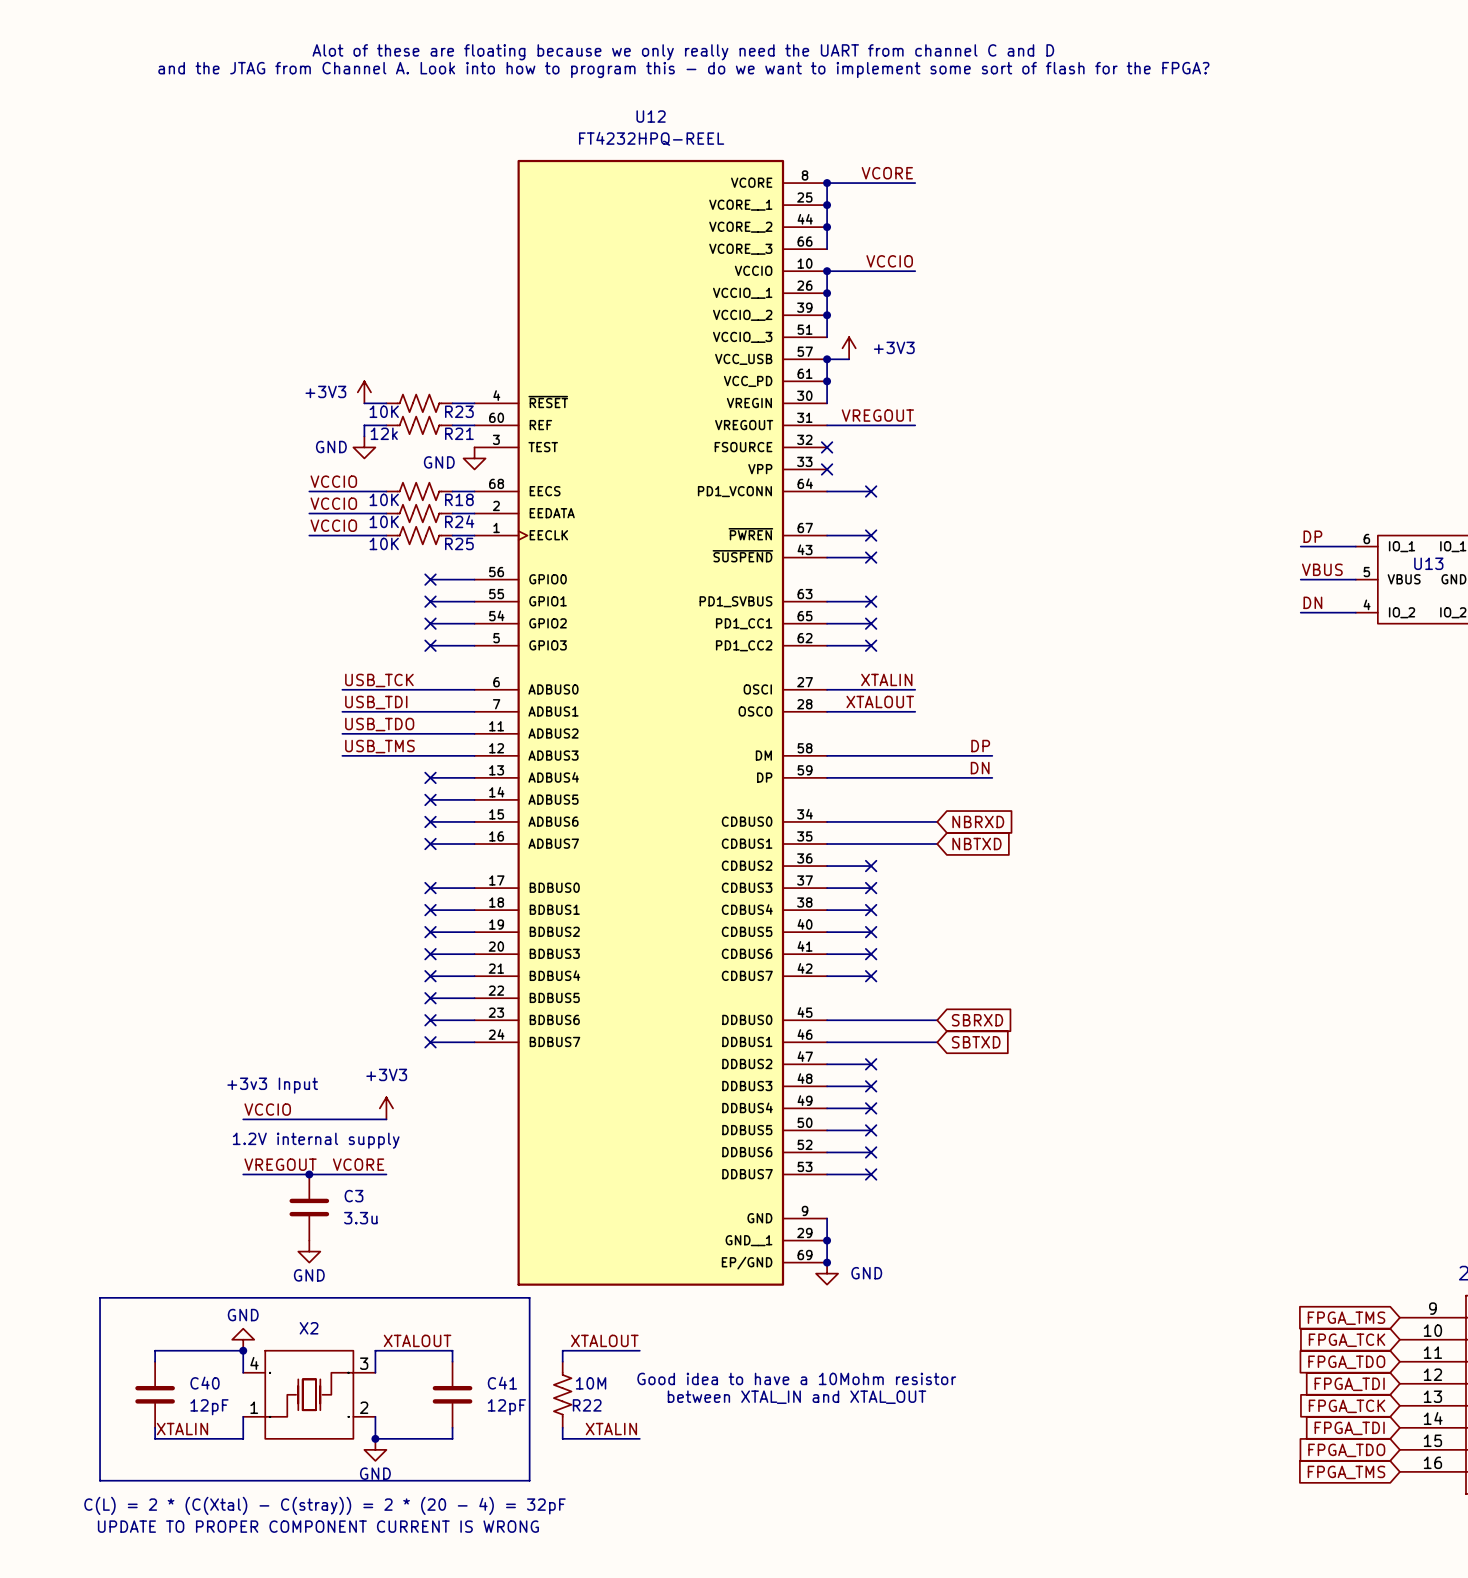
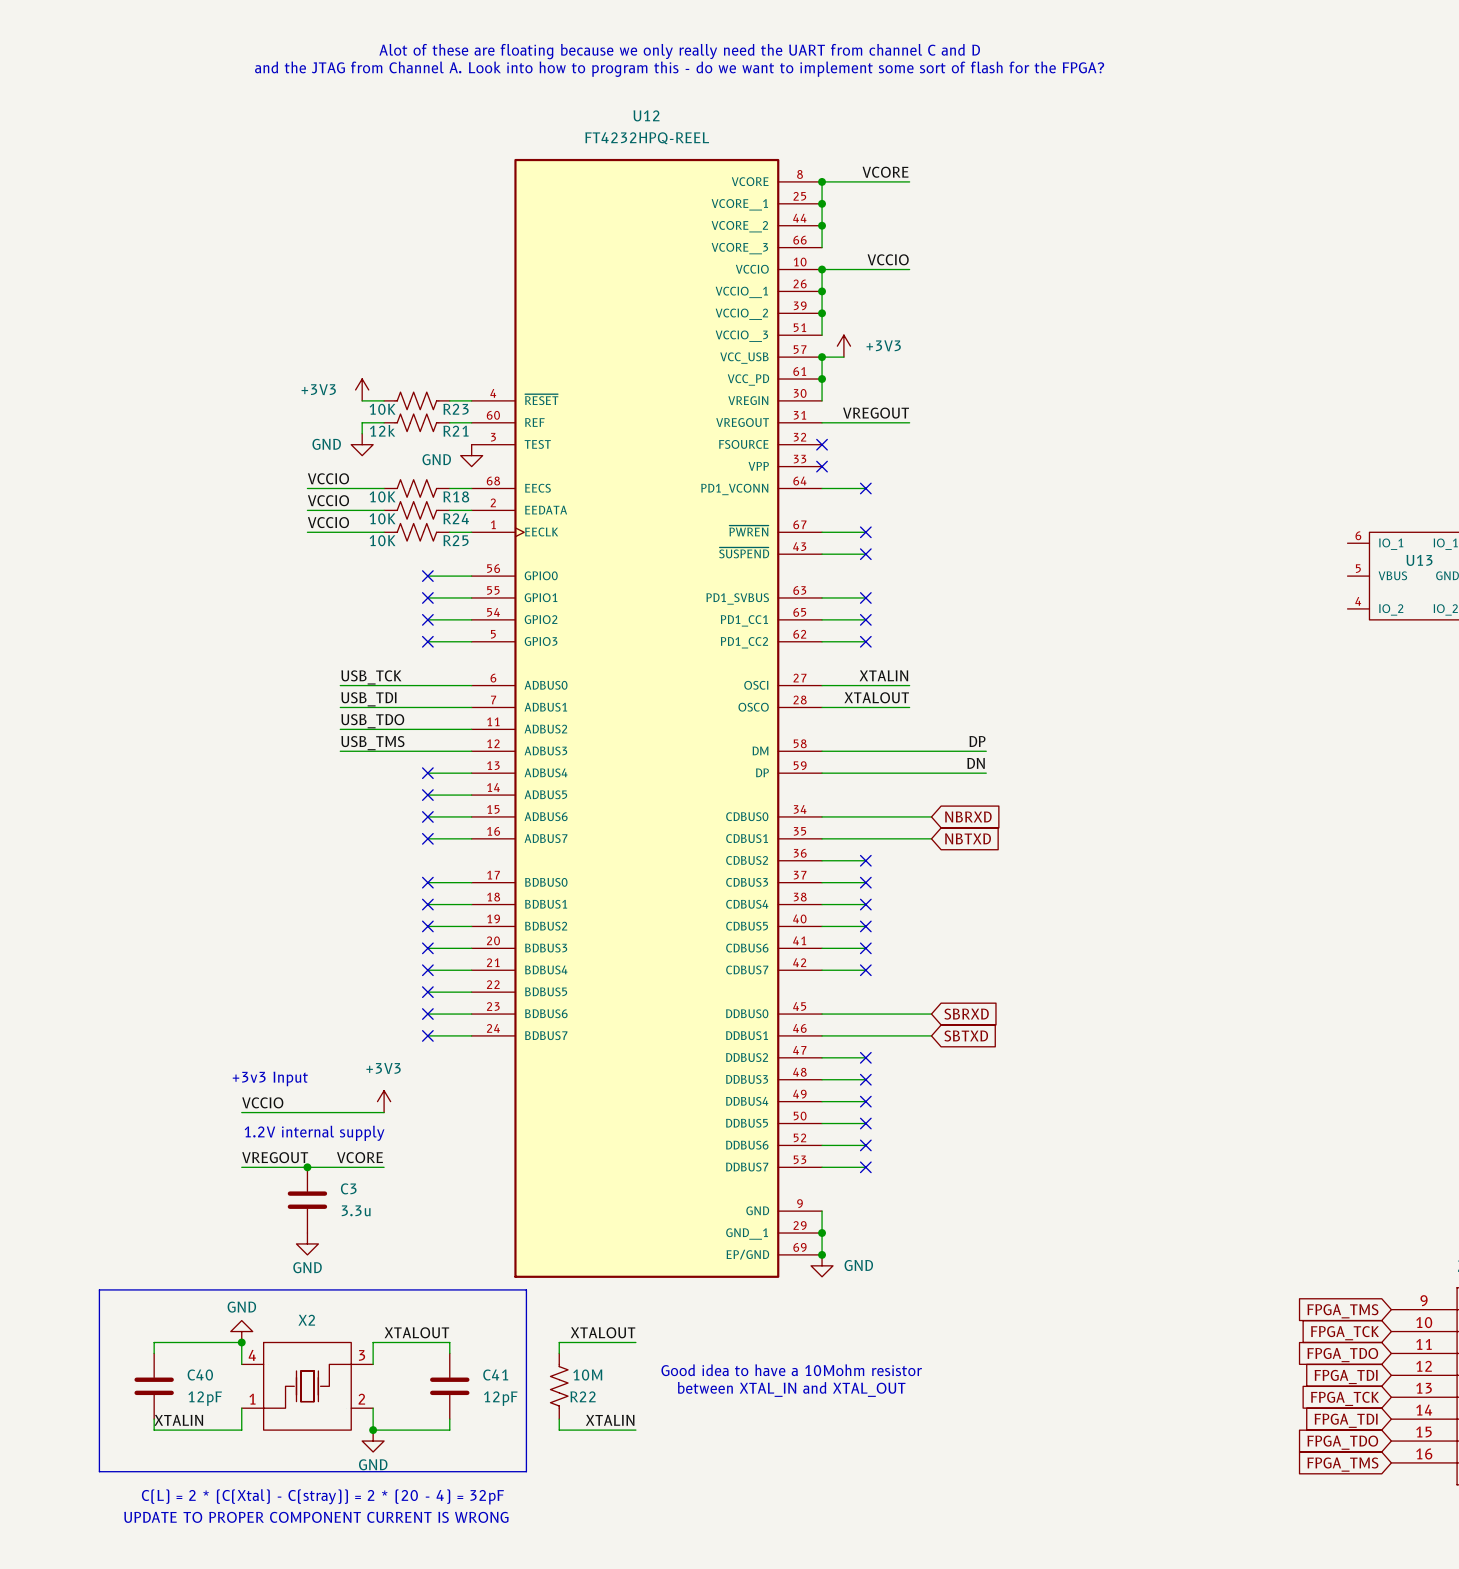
label: DP (1312, 536) -> none
wire: (1300, 546) (1355, 546) -> none
label: VBUS (1322, 569) -> none
wire: (1300, 579) (1355, 579) -> none
label: DN (1312, 602) -> none
wire: (1300, 612) (1355, 612) -> none

